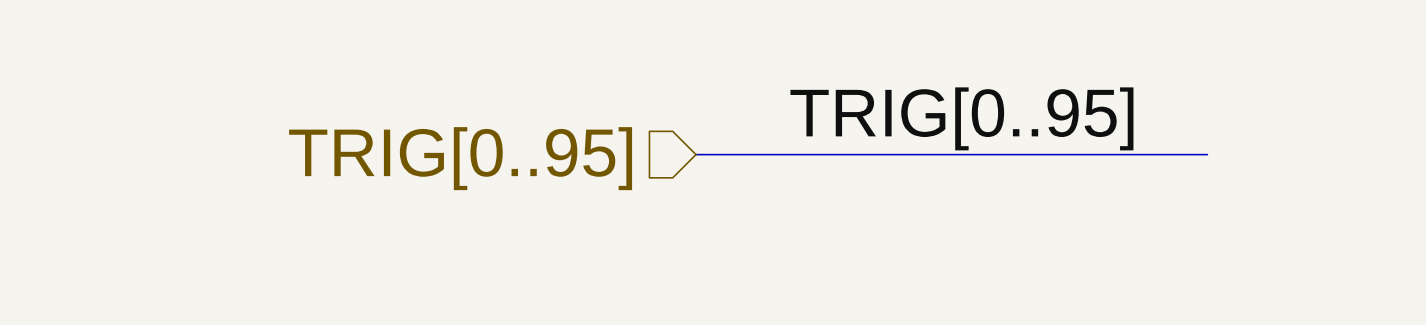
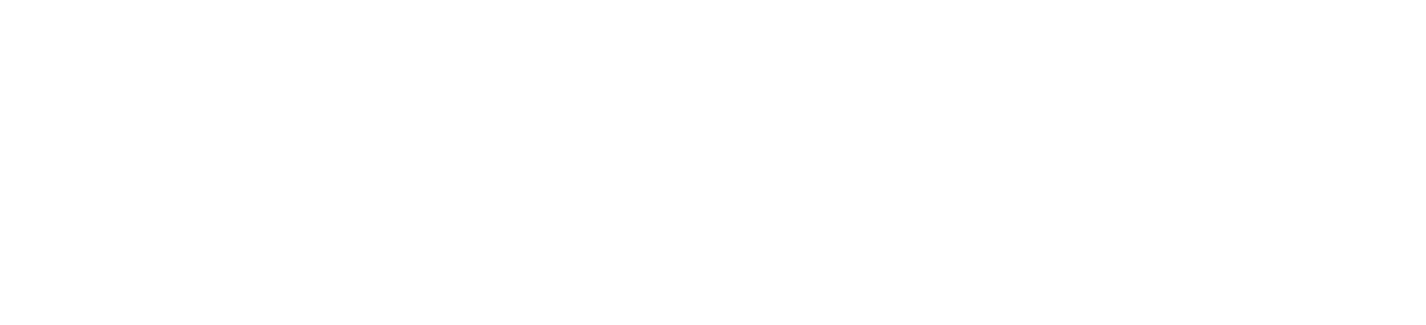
label: TRIG[0..95] (961, 118) -> none
bus: (695, 154) (1207, 154) -> none
hierarchical label: TRIG[0..95] (460, 158) -> none

